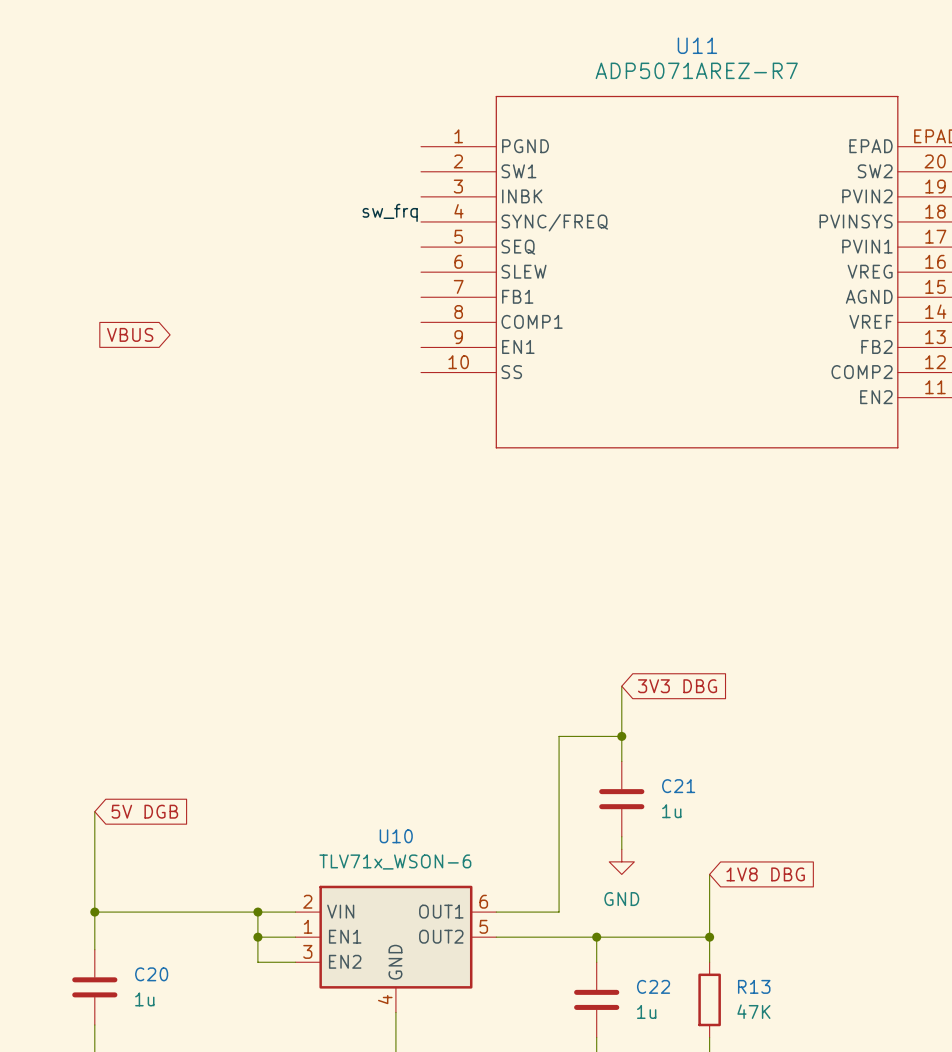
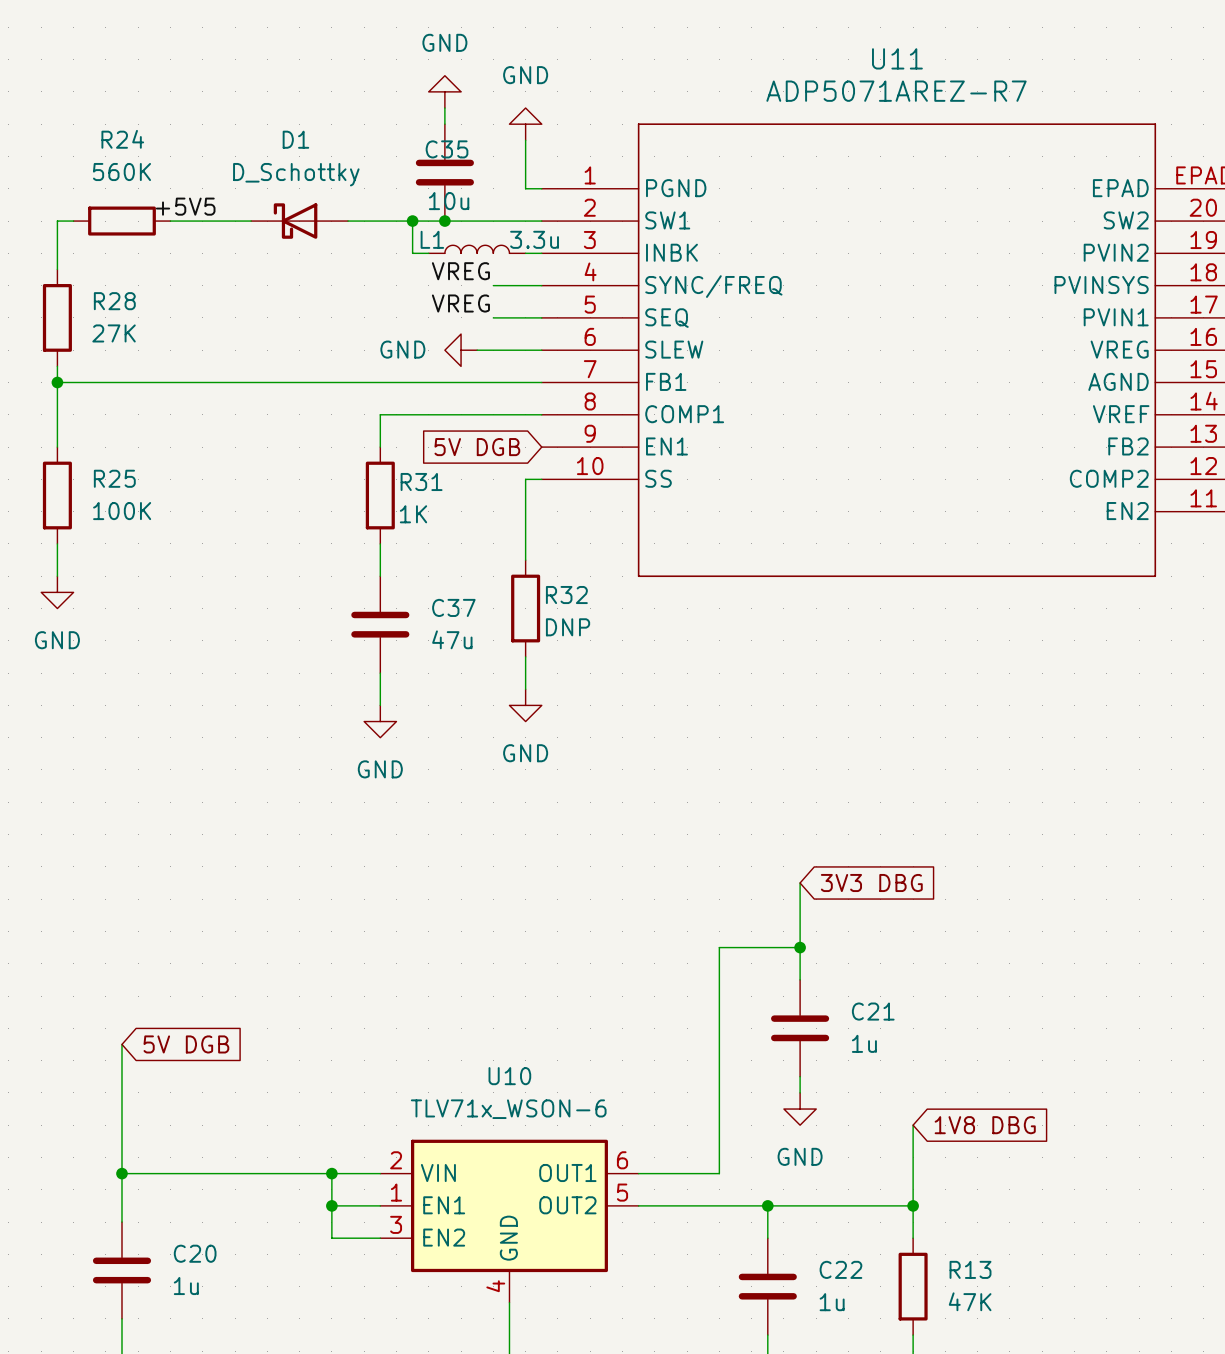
power symbol: none -> GND (444, 91)
wire: none -> (444, 108) (444, 124)
power symbol: none -> GND (525, 124)
wire: none -> (525, 140) (525, 188) (541, 188)
C35: none -> 10u (444, 172)
label: none -> +5V5 (185, 206)
wire: none -> (73, 221) (57, 221) (57, 269)
R24: none -> 560K (121, 221)
wire: none -> (170, 221) (251, 221)
D1: none -> D_Schottky (299, 221)
wire: none -> (348, 221) (541, 221)
wire: none -> (412, 221) (412, 253) (428, 253)
junction: none -> (412, 221)
junction: none -> (444, 221)
L1: none -> 3.3u (477, 249)
wire: none -> (525, 253) (541, 253)
label: none -> VREG (460, 271)
label: sw_frq (390, 212) -> none
wire: none -> (493, 285) (541, 285)
label: none -> VREG (460, 303)
R28: none -> 27K (57, 317)
wire: none -> (493, 317) (541, 317)
power symbol: none -> GND (461, 350)
wire: none -> (477, 350) (541, 350)
wire: none -> (57, 366) (57, 447)
wire: none -> (57, 382) (541, 382)
junction: none -> (57, 382)
wire: none -> (541, 414) (380, 414) (380, 447)
global label: VBUS (130, 334) -> none
global label: none -> 5V DGB (477, 447)
wire: none -> (541, 479) (525, 479) (525, 560)
R25: none -> 100K (57, 495)
R31: none -> 1K (380, 495)
wire: none -> (57, 543) (57, 576)
wire: none -> (380, 543) (380, 576)
power symbol: none -> GND (57, 592)
R32: none -> DNP (525, 608)
C37: none -> 47u (380, 624)
wire: none -> (525, 656) (525, 689)
wire: none -> (380, 673) (380, 705)
power symbol: none -> GND (525, 705)
power symbol: none -> GND (380, 721)

